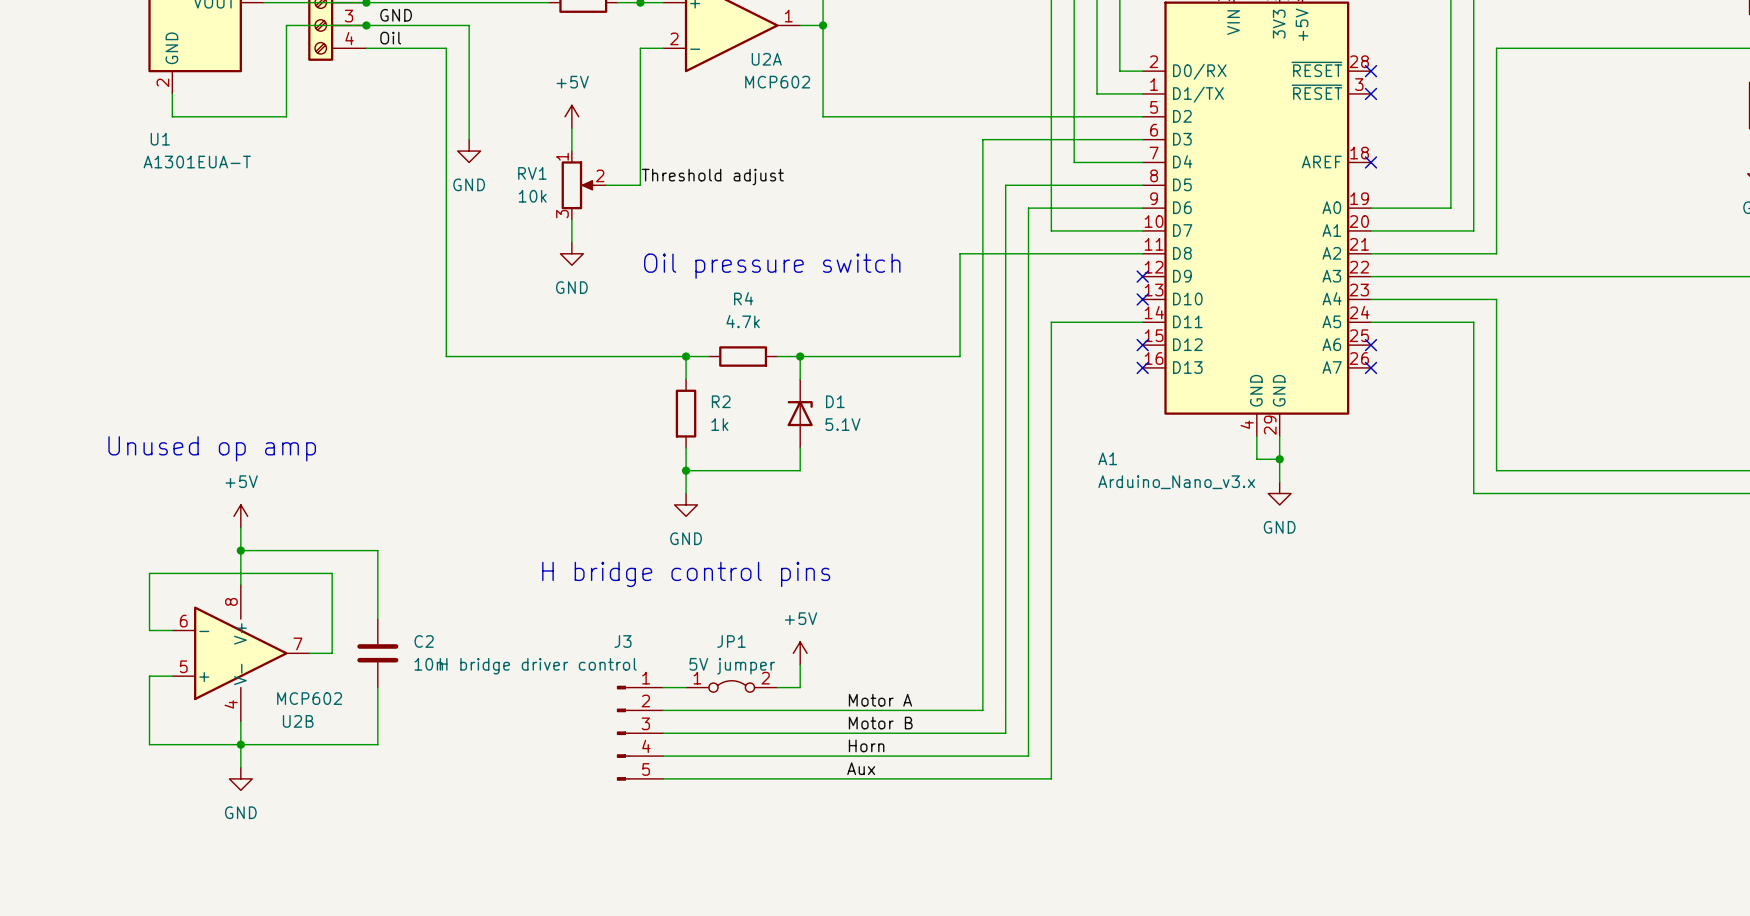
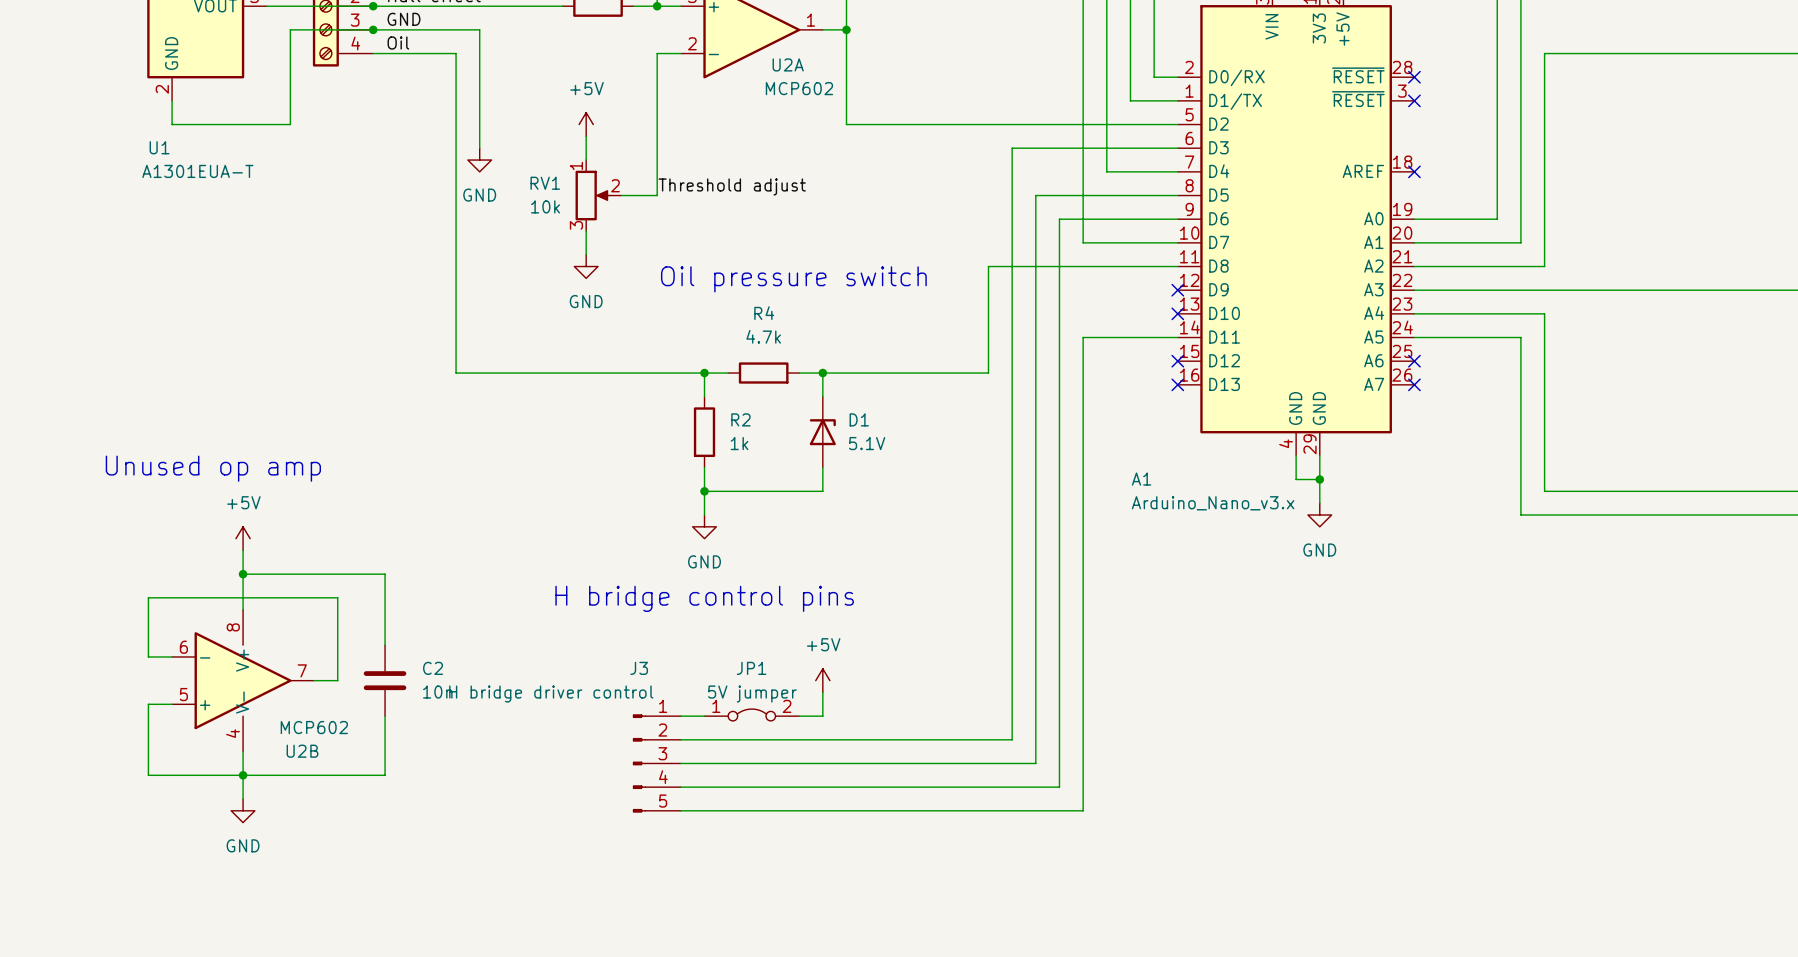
label: Motor A (880, 700) -> none
label: Motor B (880, 723) -> none
label: Horn (866, 745) -> none
label: Aux (861, 768) -> none

